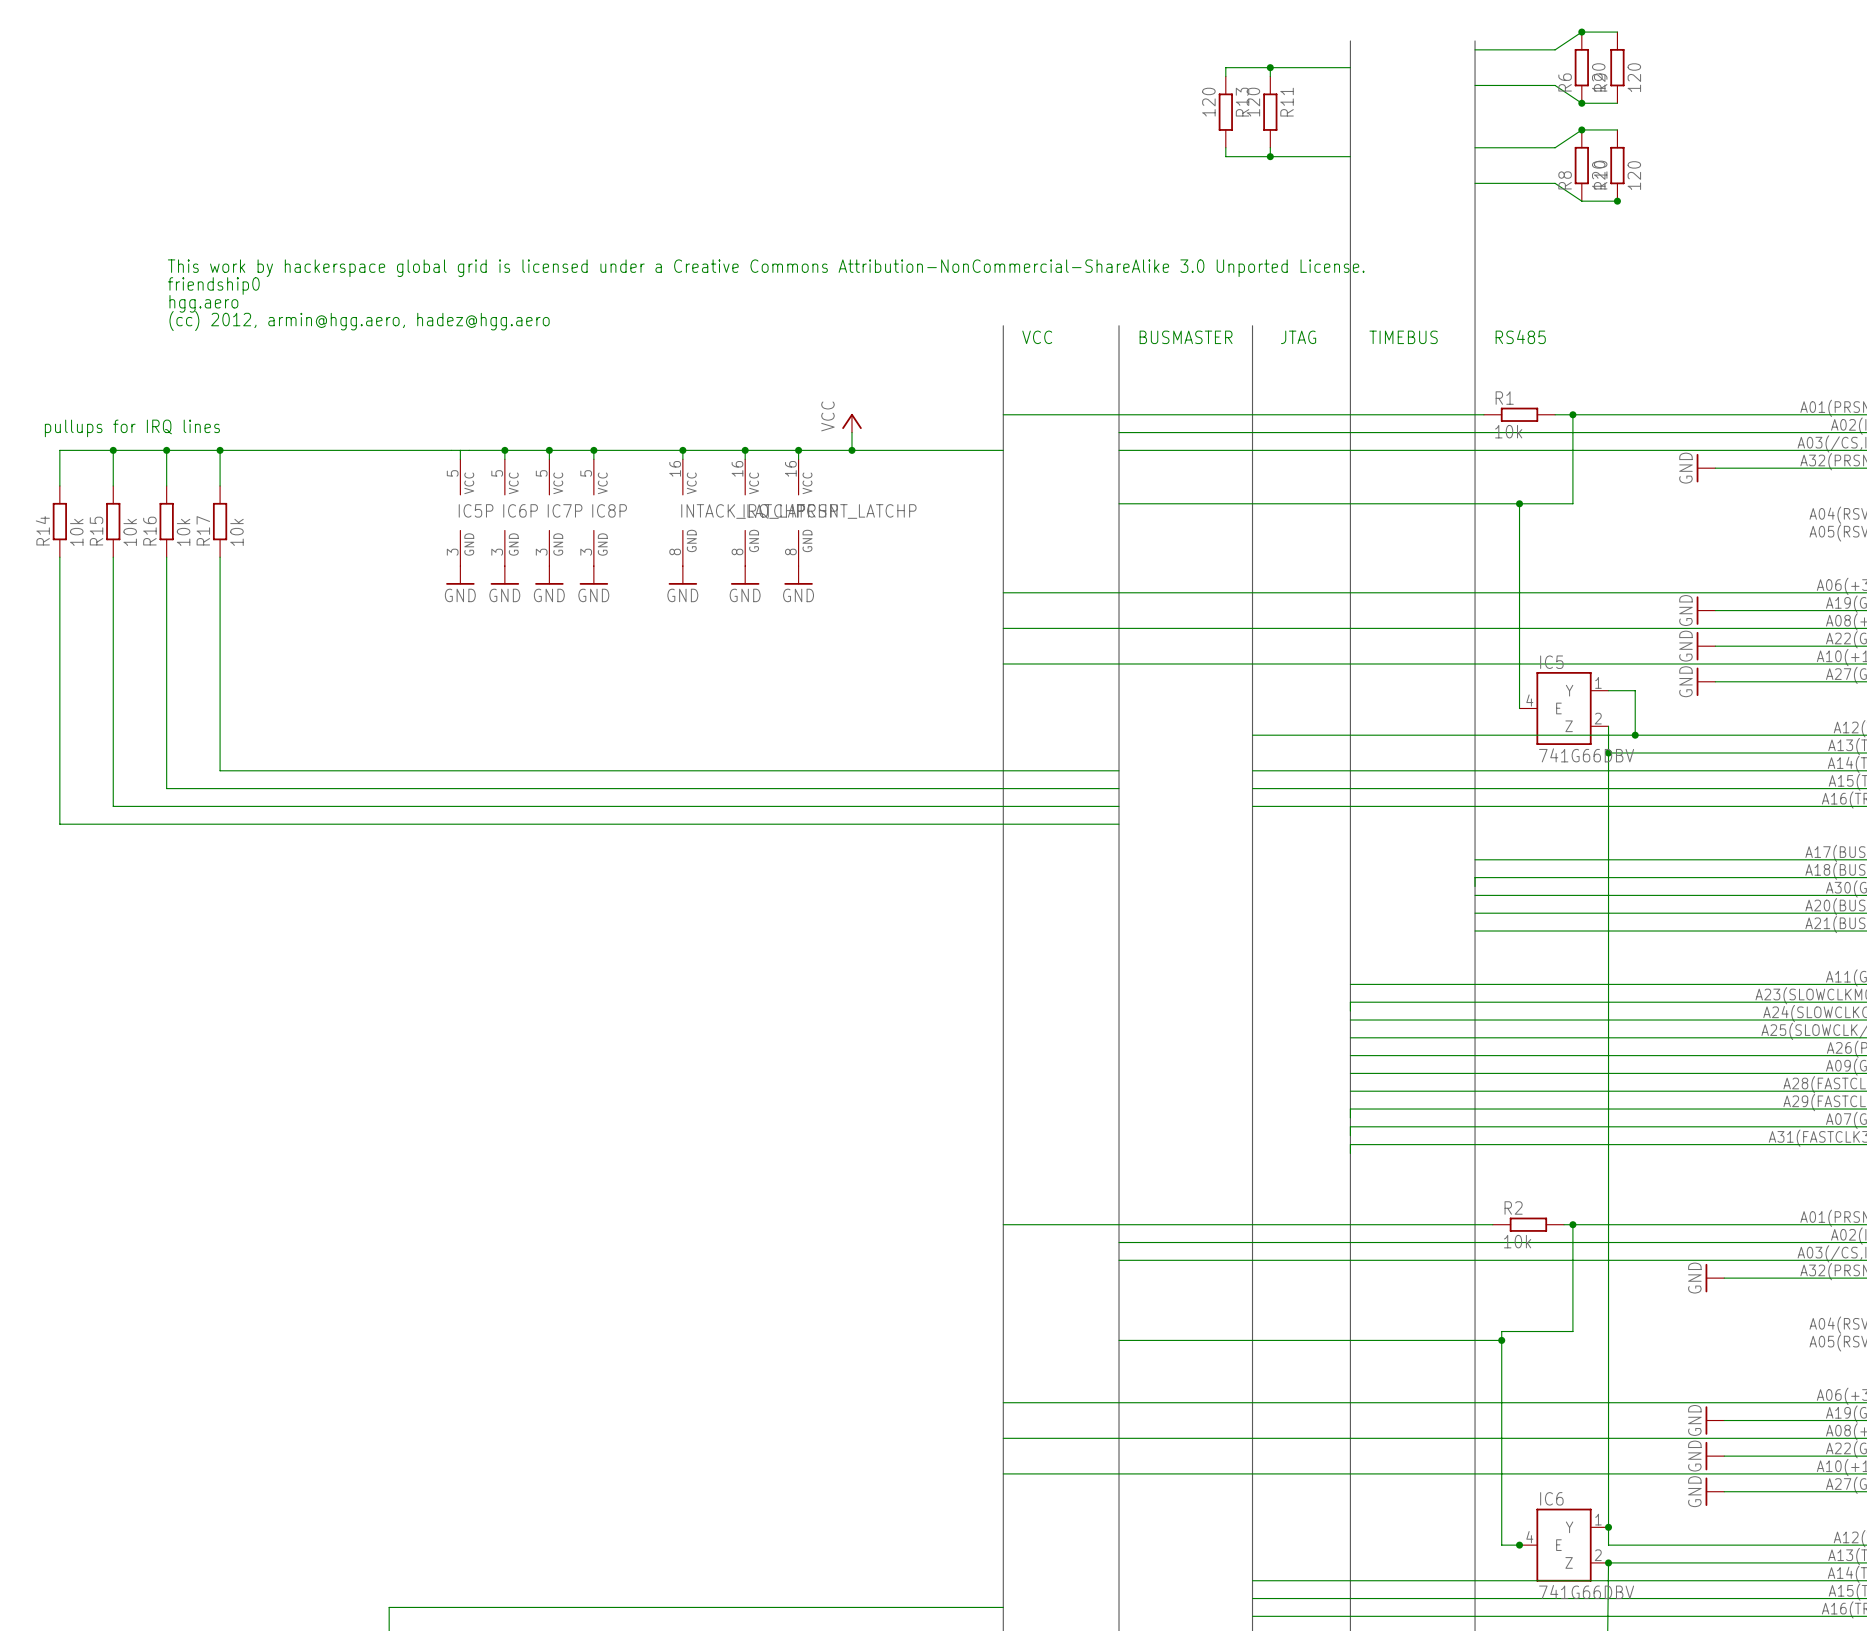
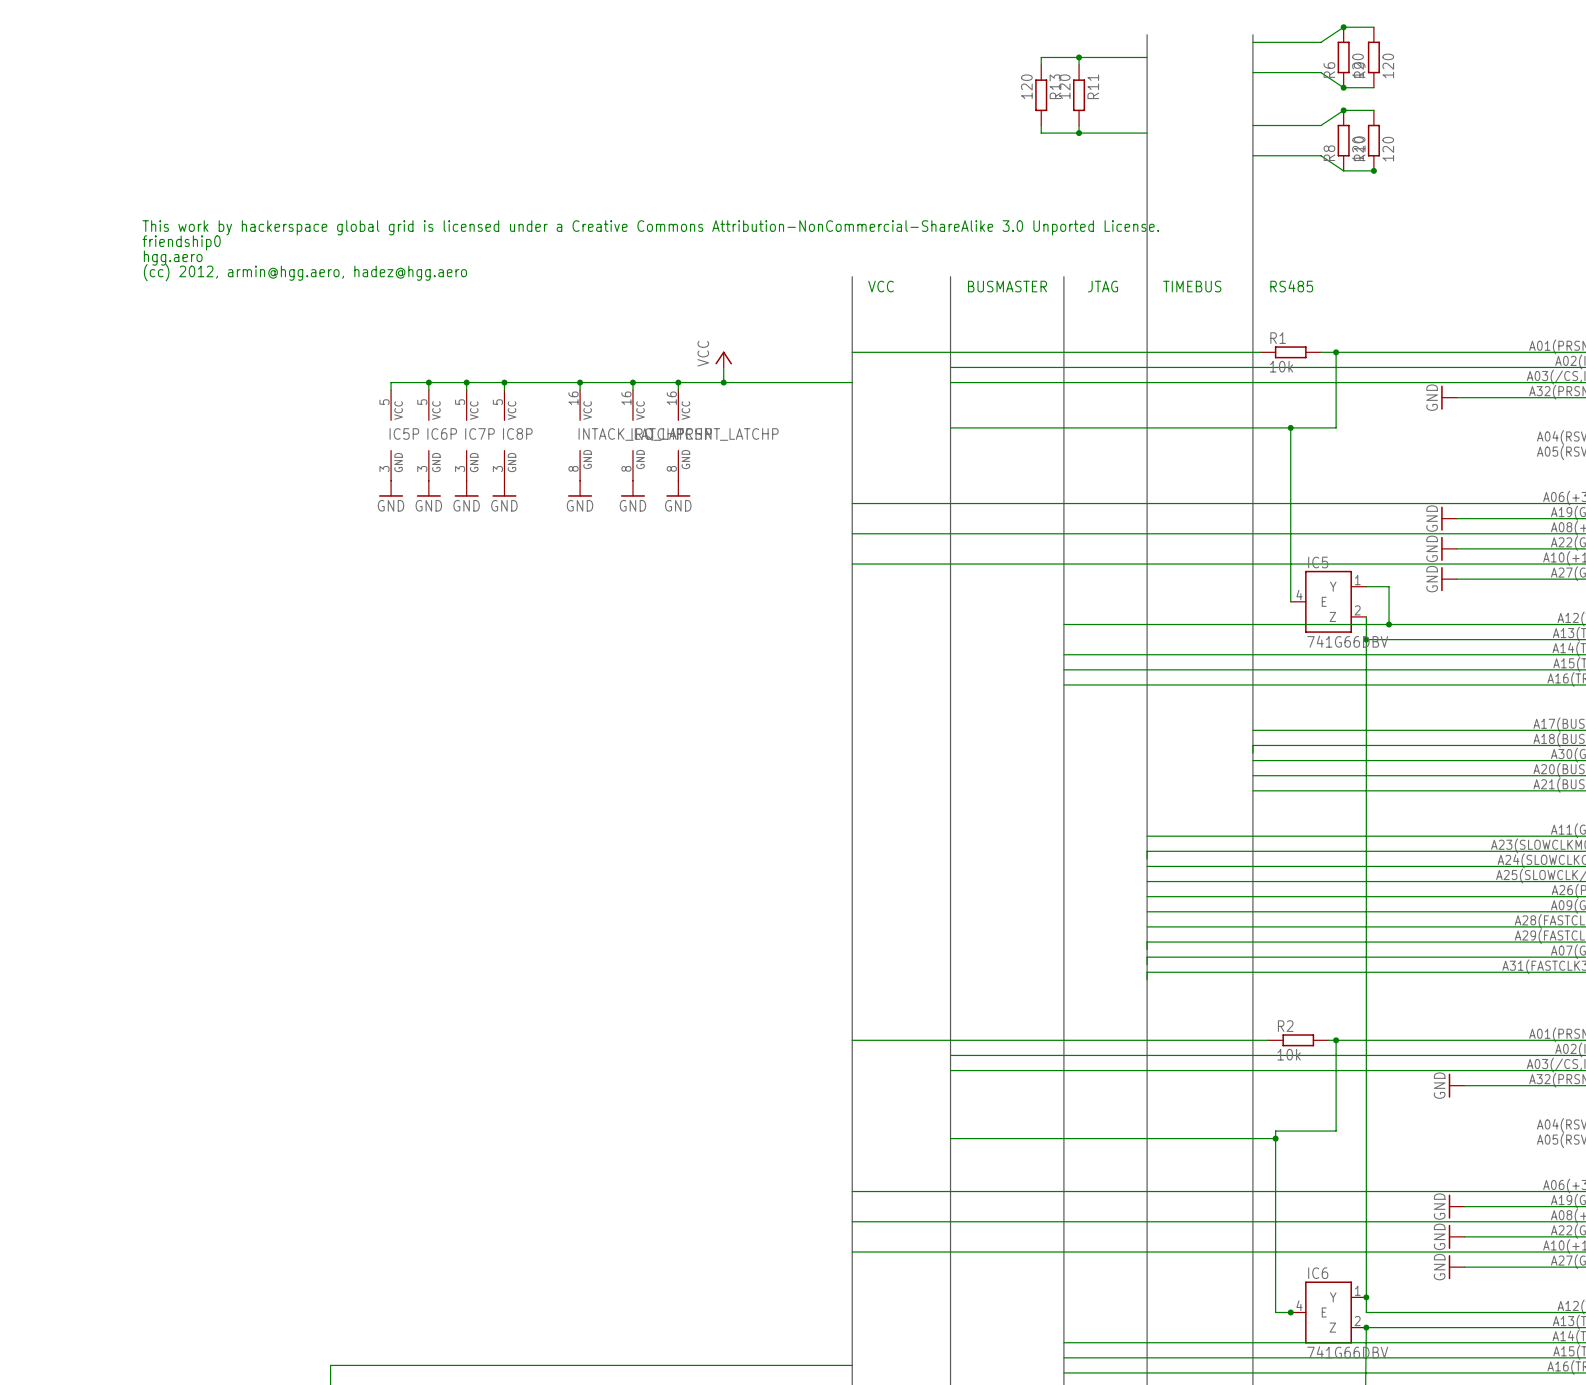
text: pullups for IRQ lines (132, 428) -> none
wire: (113, 450) (113, 485) -> none
junction: (113, 450) -> none
wire: (166, 450) (166, 485) -> none
junction: (166, 450) -> none
wire: (220, 450) (220, 485) -> none
junction: (220, 450) -> none
wire: (460, 450) (59, 450) (59, 485) -> none
R14: 10k (59, 521) -> none
R15: 10k (113, 521) -> none
R16: 10k (166, 521) -> none
R17: 10k (220, 521) -> none
wire: (59, 557) (59, 824) (1119, 824) -> none
wire: (113, 557) (113, 806) (1119, 806) -> none
wire: (166, 557) (166, 788) (1119, 788) -> none
wire: (220, 557) (220, 770) (1119, 770) -> none

